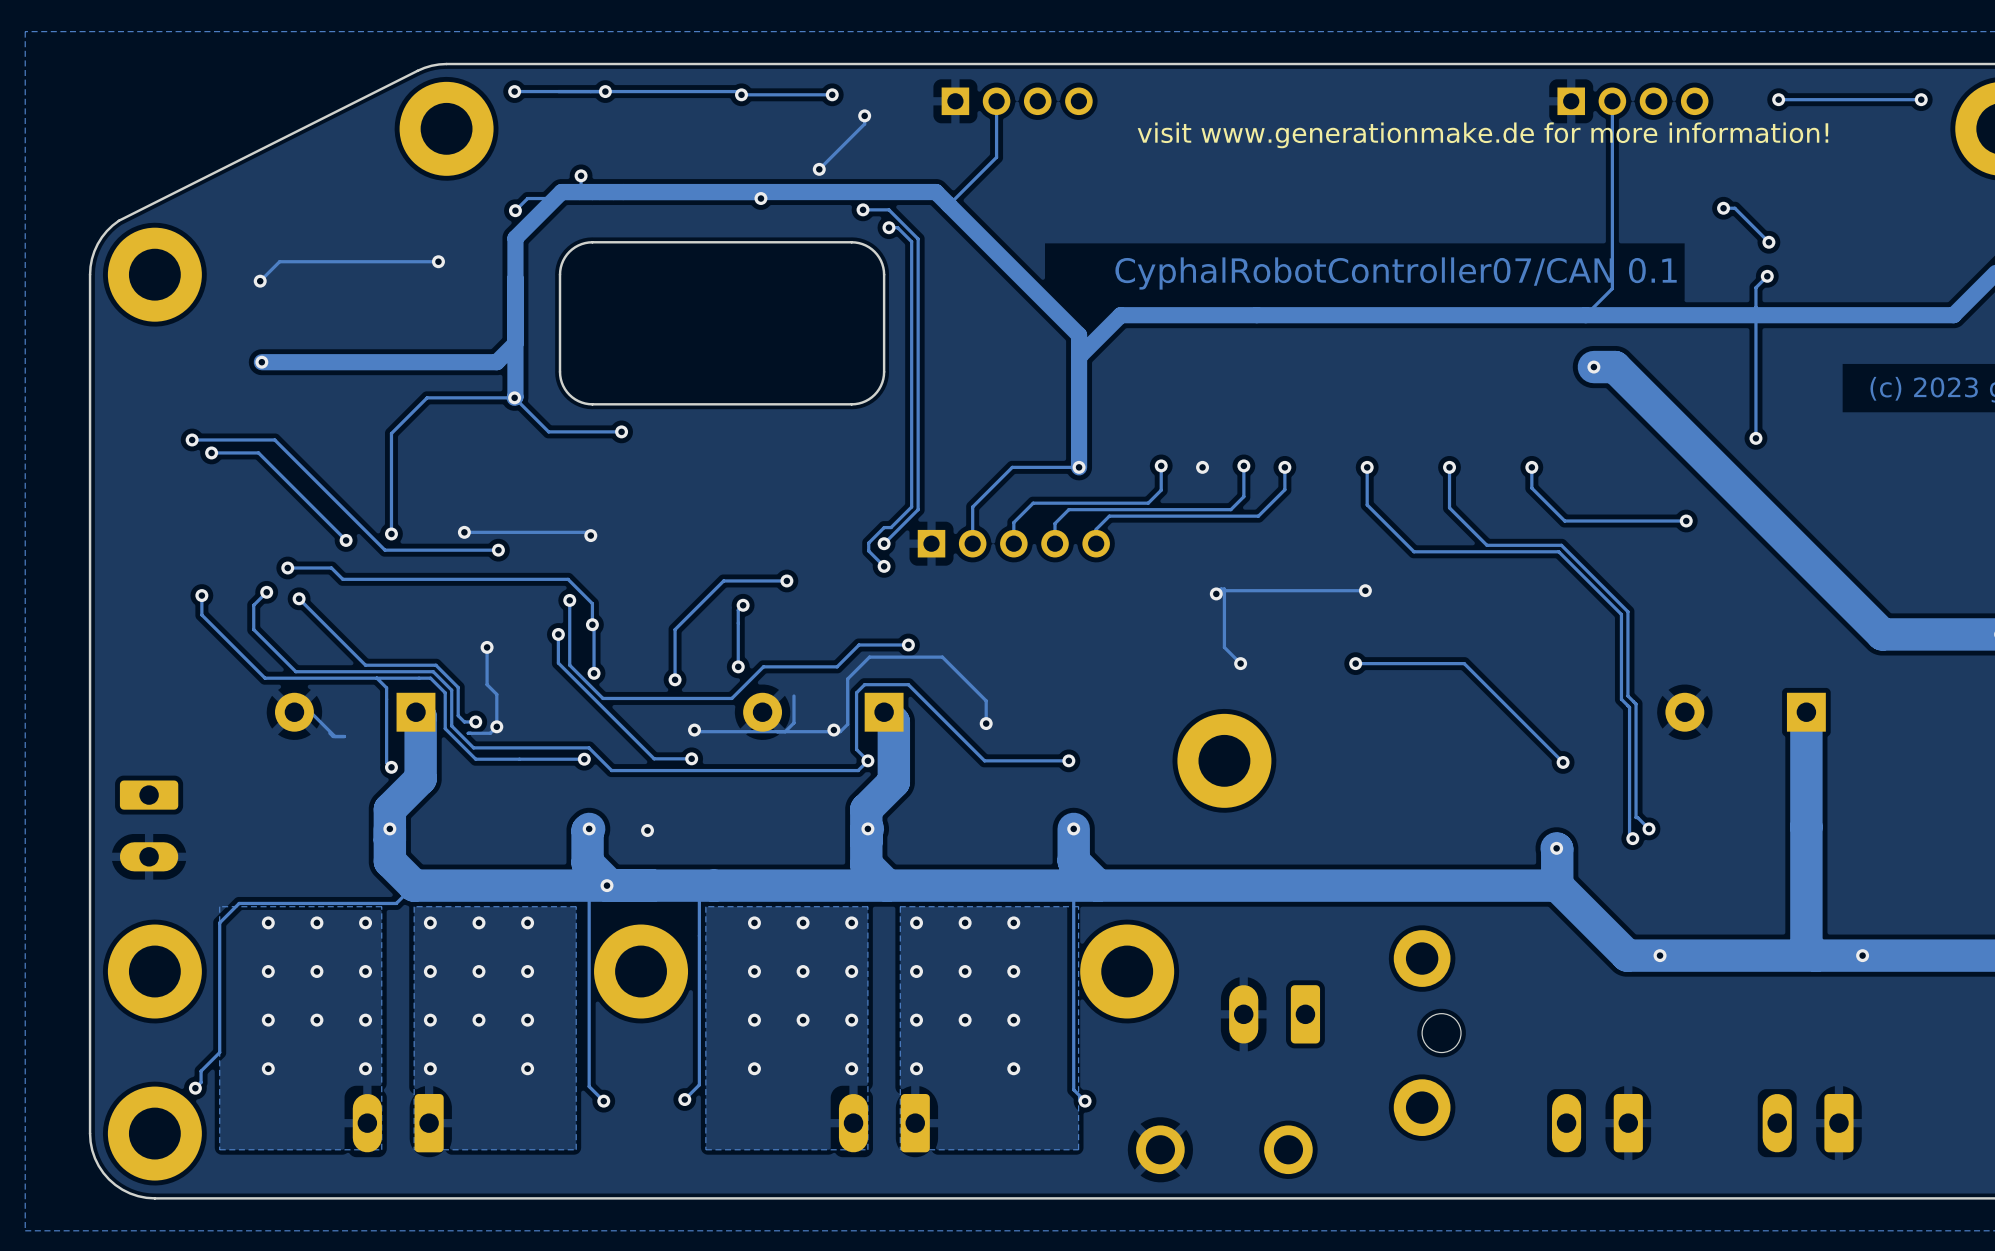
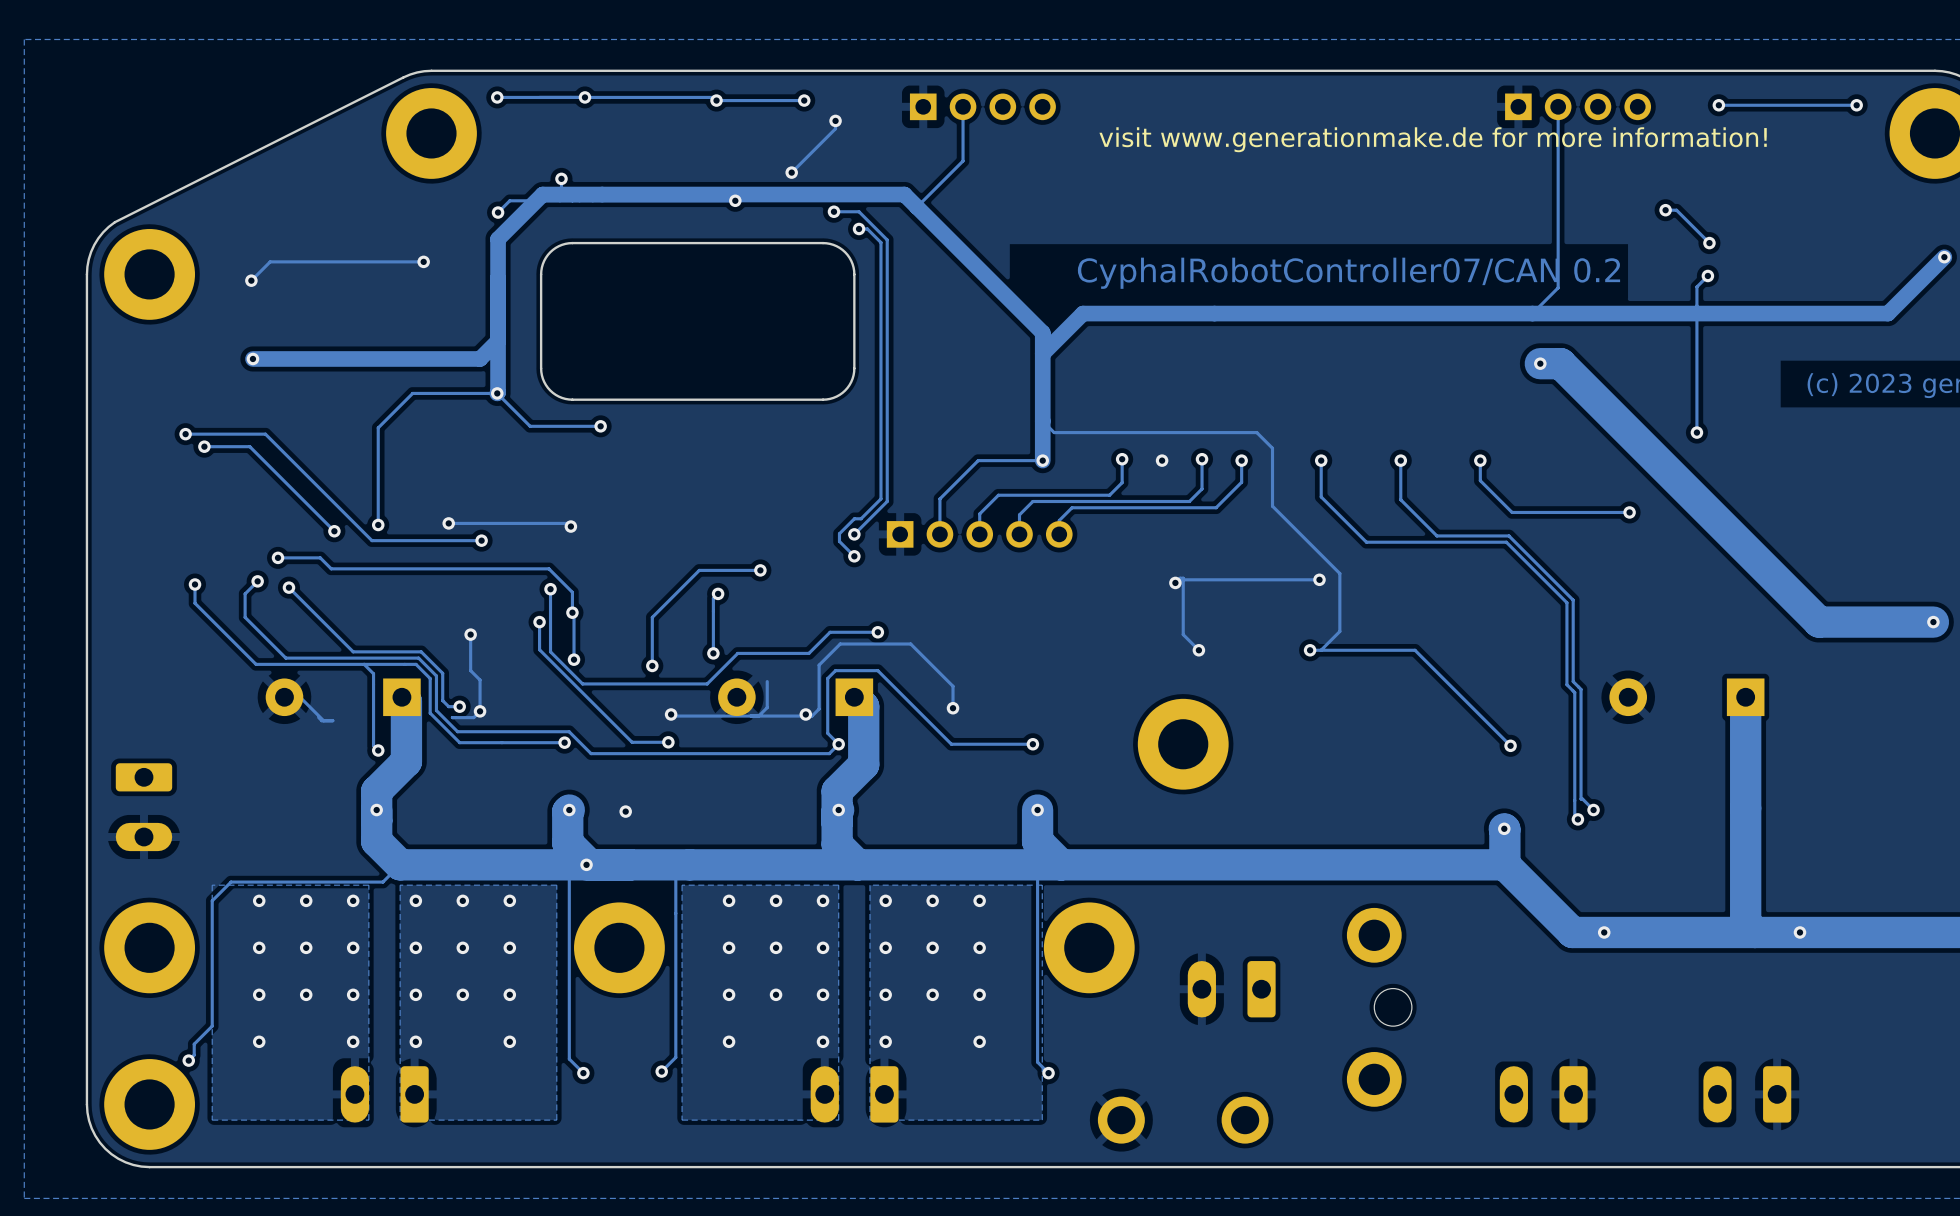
text: CyphalRobotController07/CAN 0.1 (1396, 273) -> CyphalRobotController07/CAN 0.2 (1348, 273)
track: none -> (1042, 421) (1054, 432) (1256, 432) (1272, 448) (1272, 506) (1339, 573) (1339, 631) (1321, 650)

